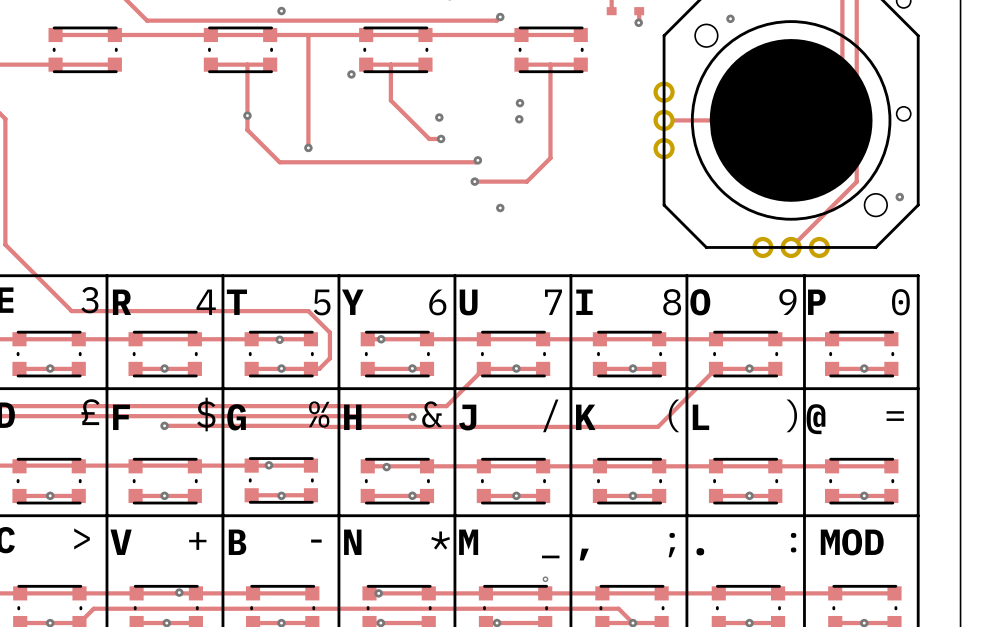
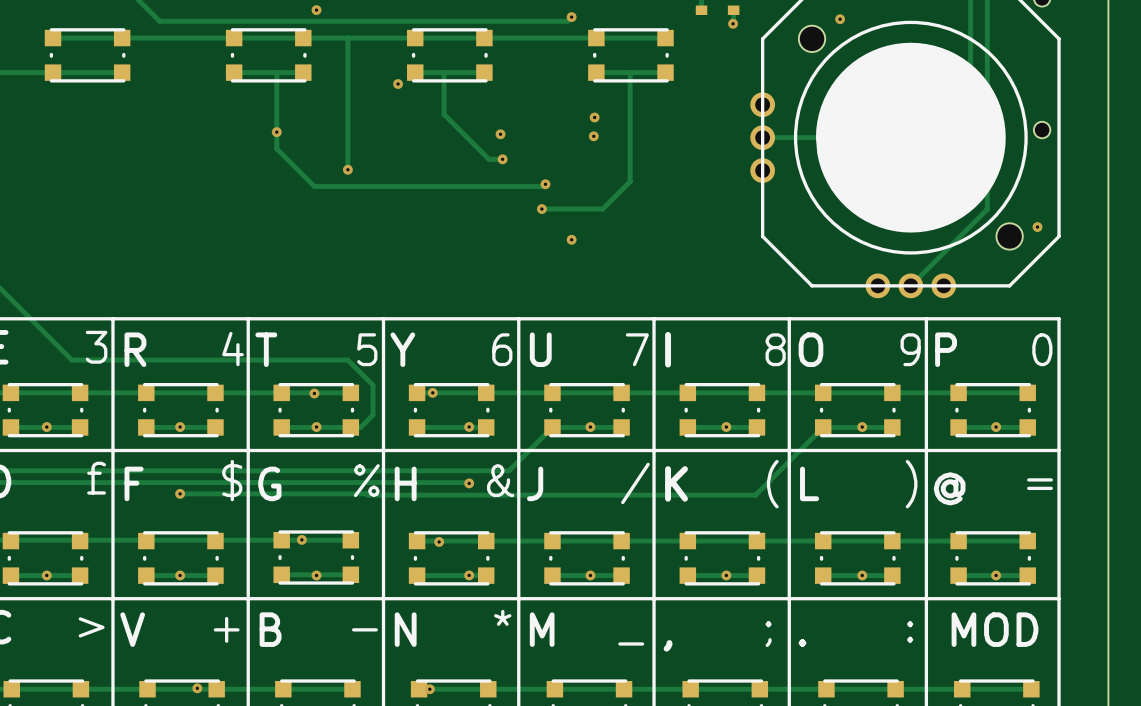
via: (545, 579) -> none

